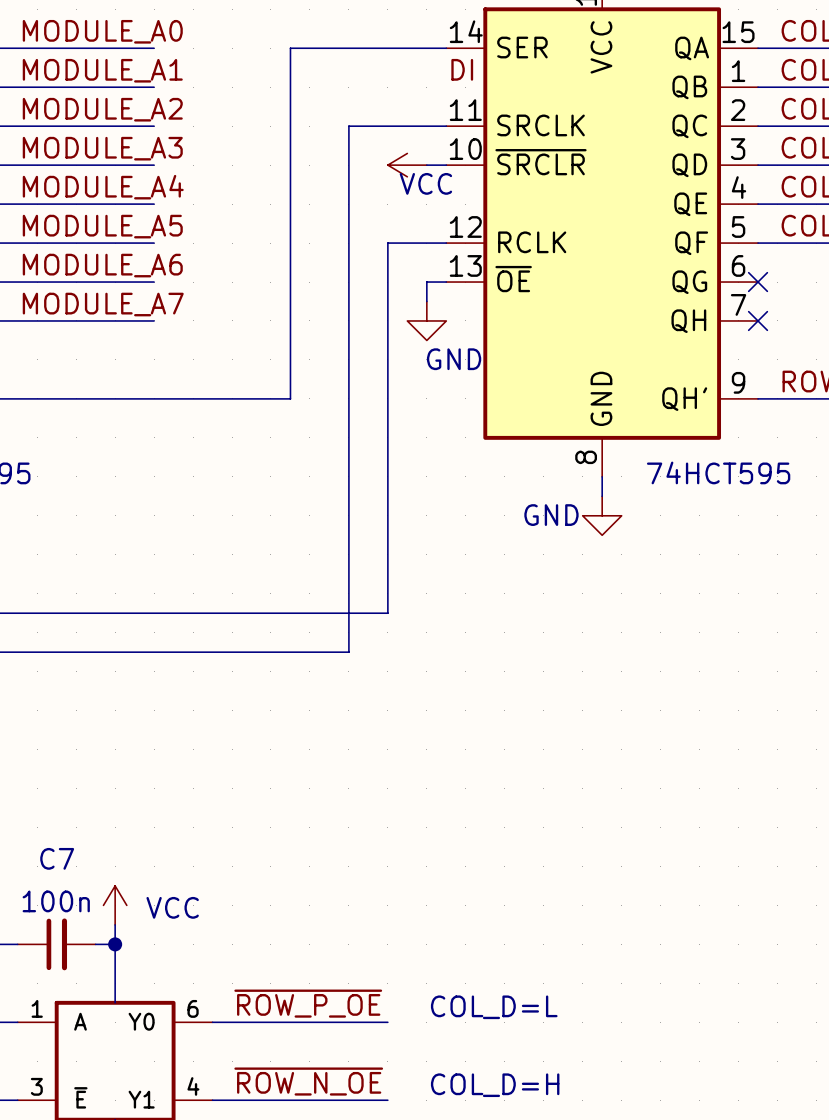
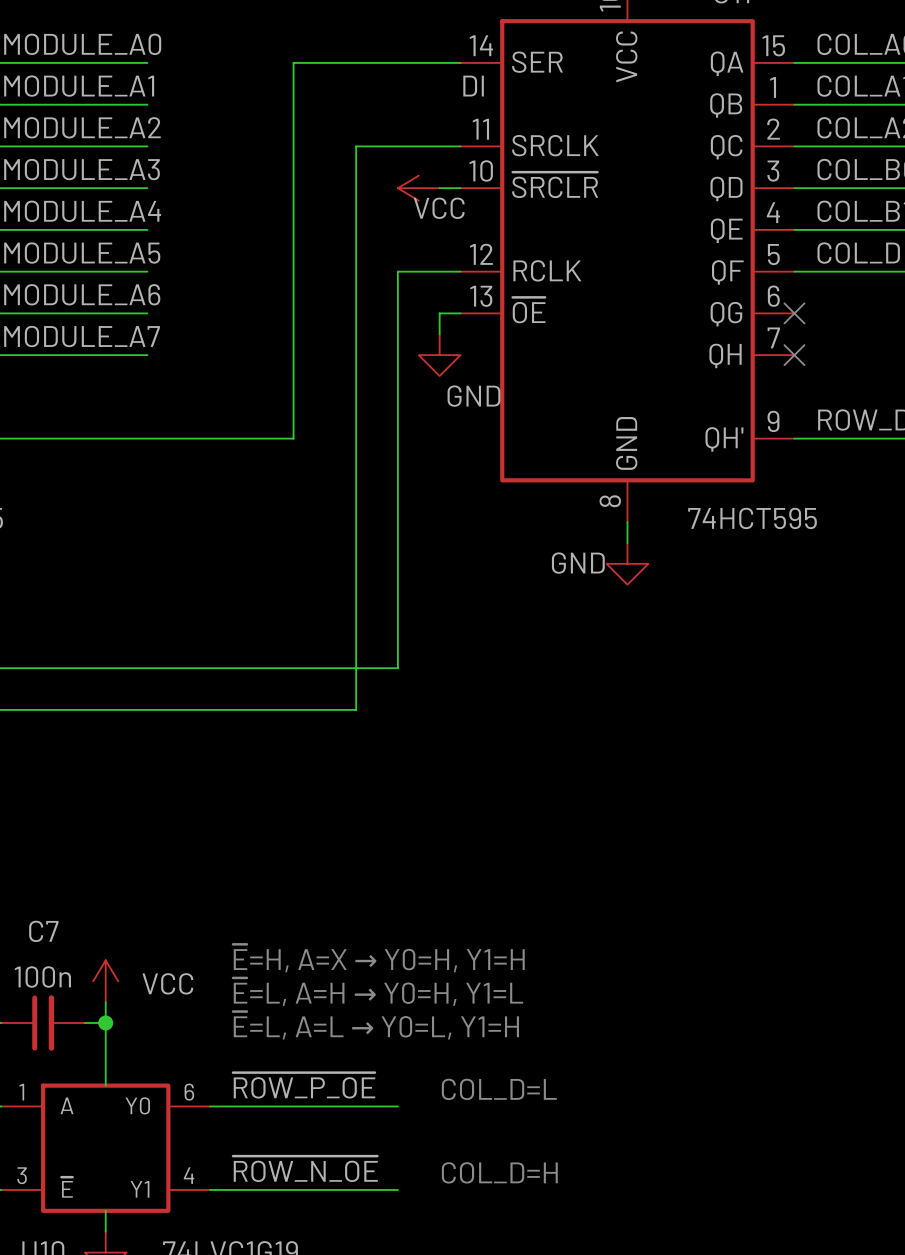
text: none -> ~{E}=H, A=X → Y0=H, Y1=H (378, 958)
text: none -> ~{E}=L, A=H → Y0=H, Y1=L (378, 991)
text: none -> ~{E}=L, A=L → Y0=L, Y1=H (376, 1025)

